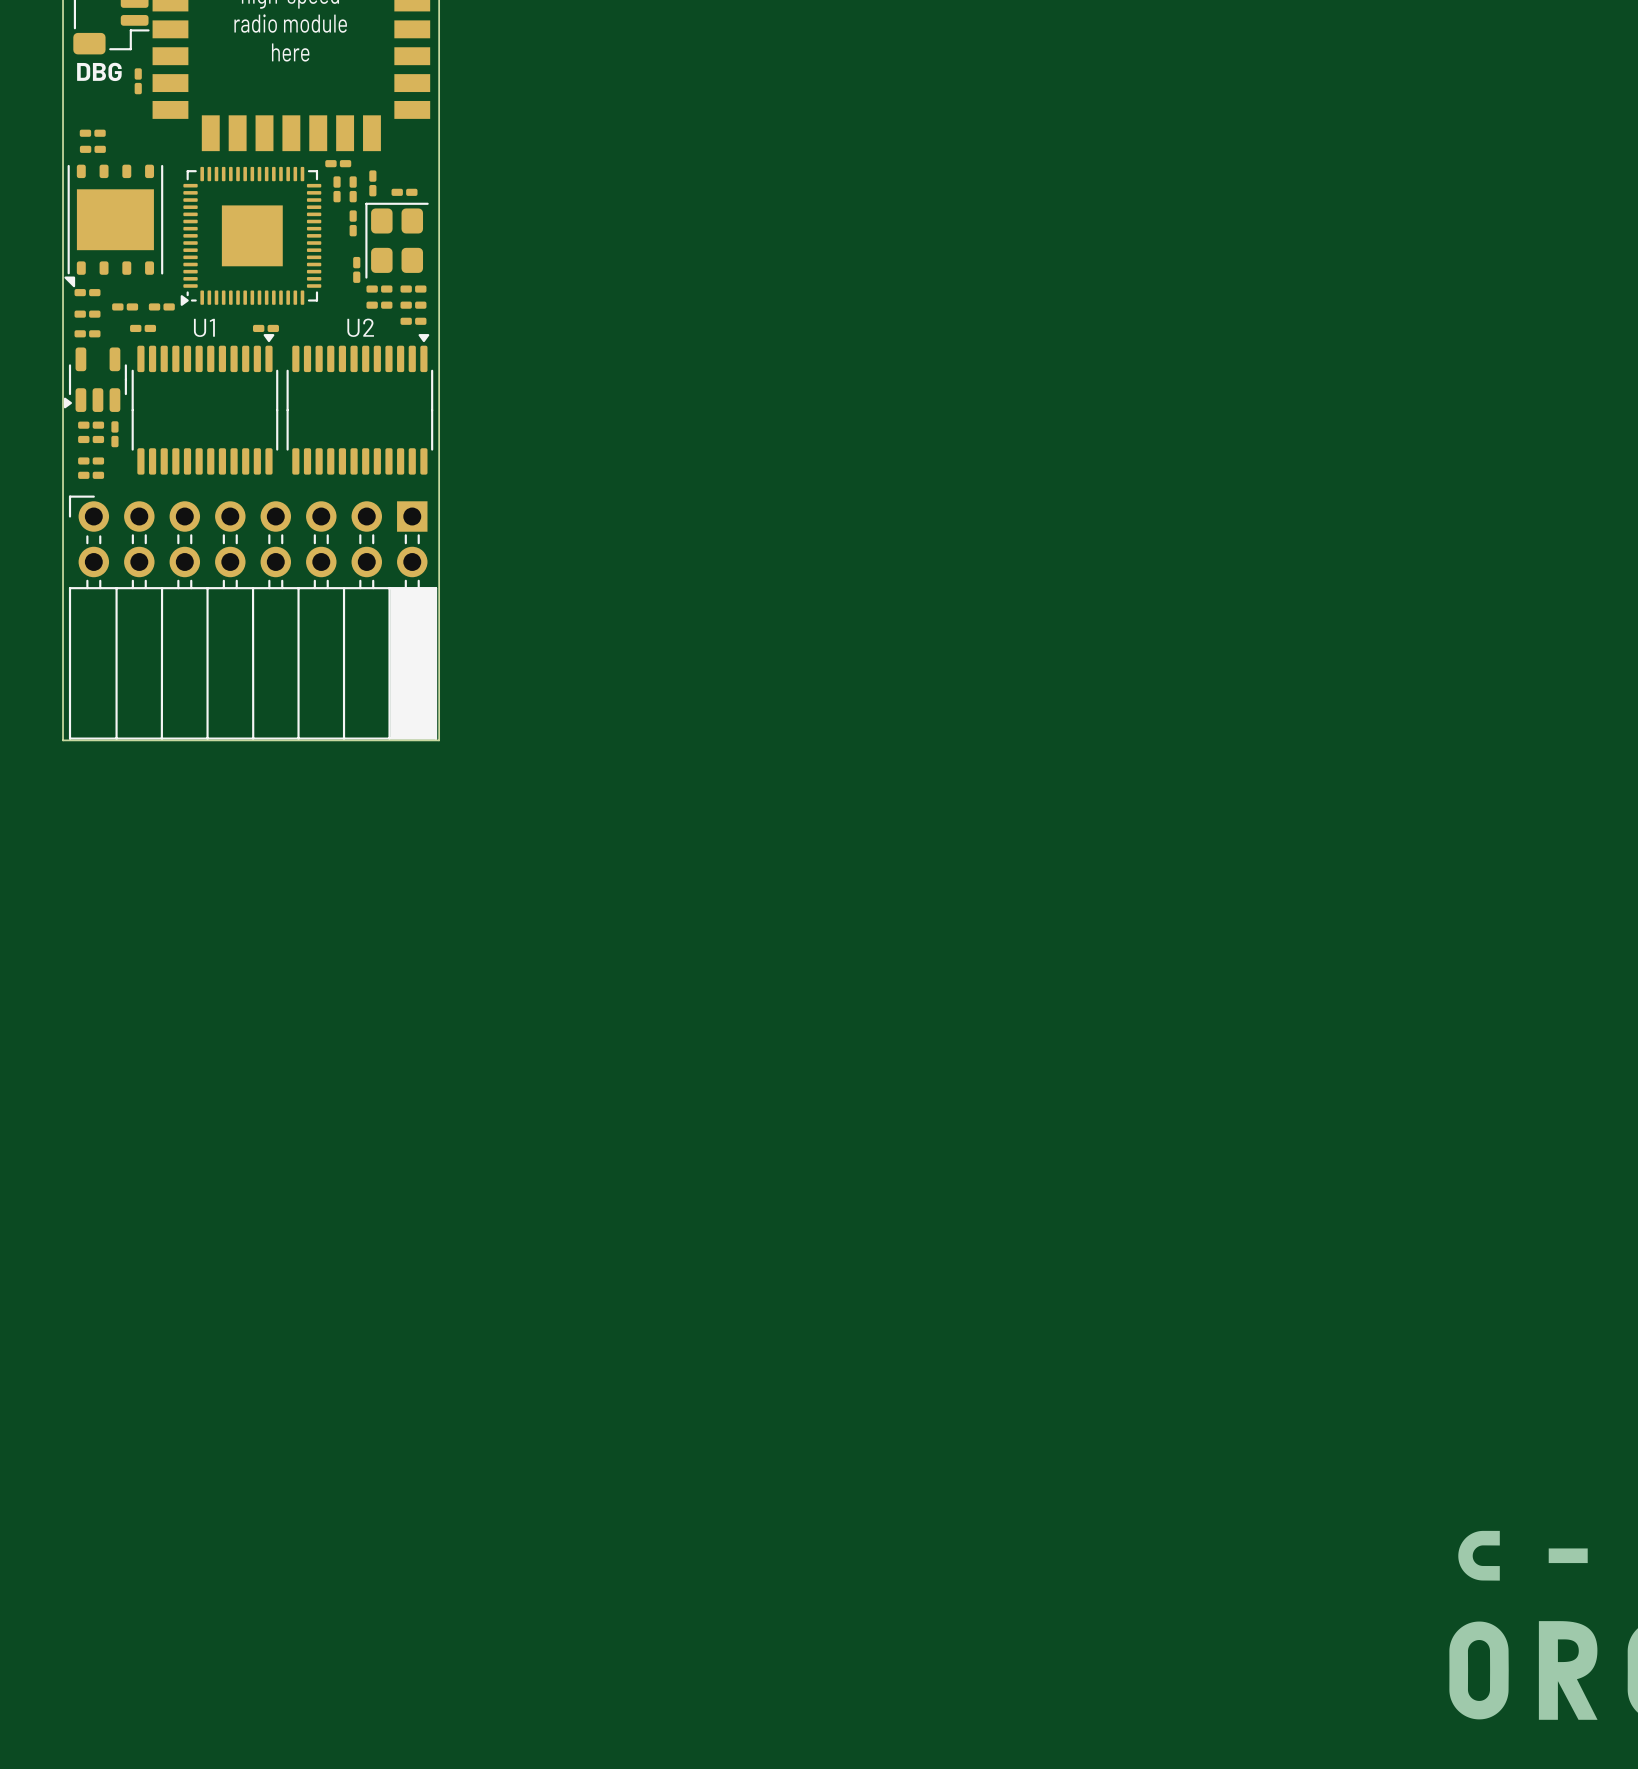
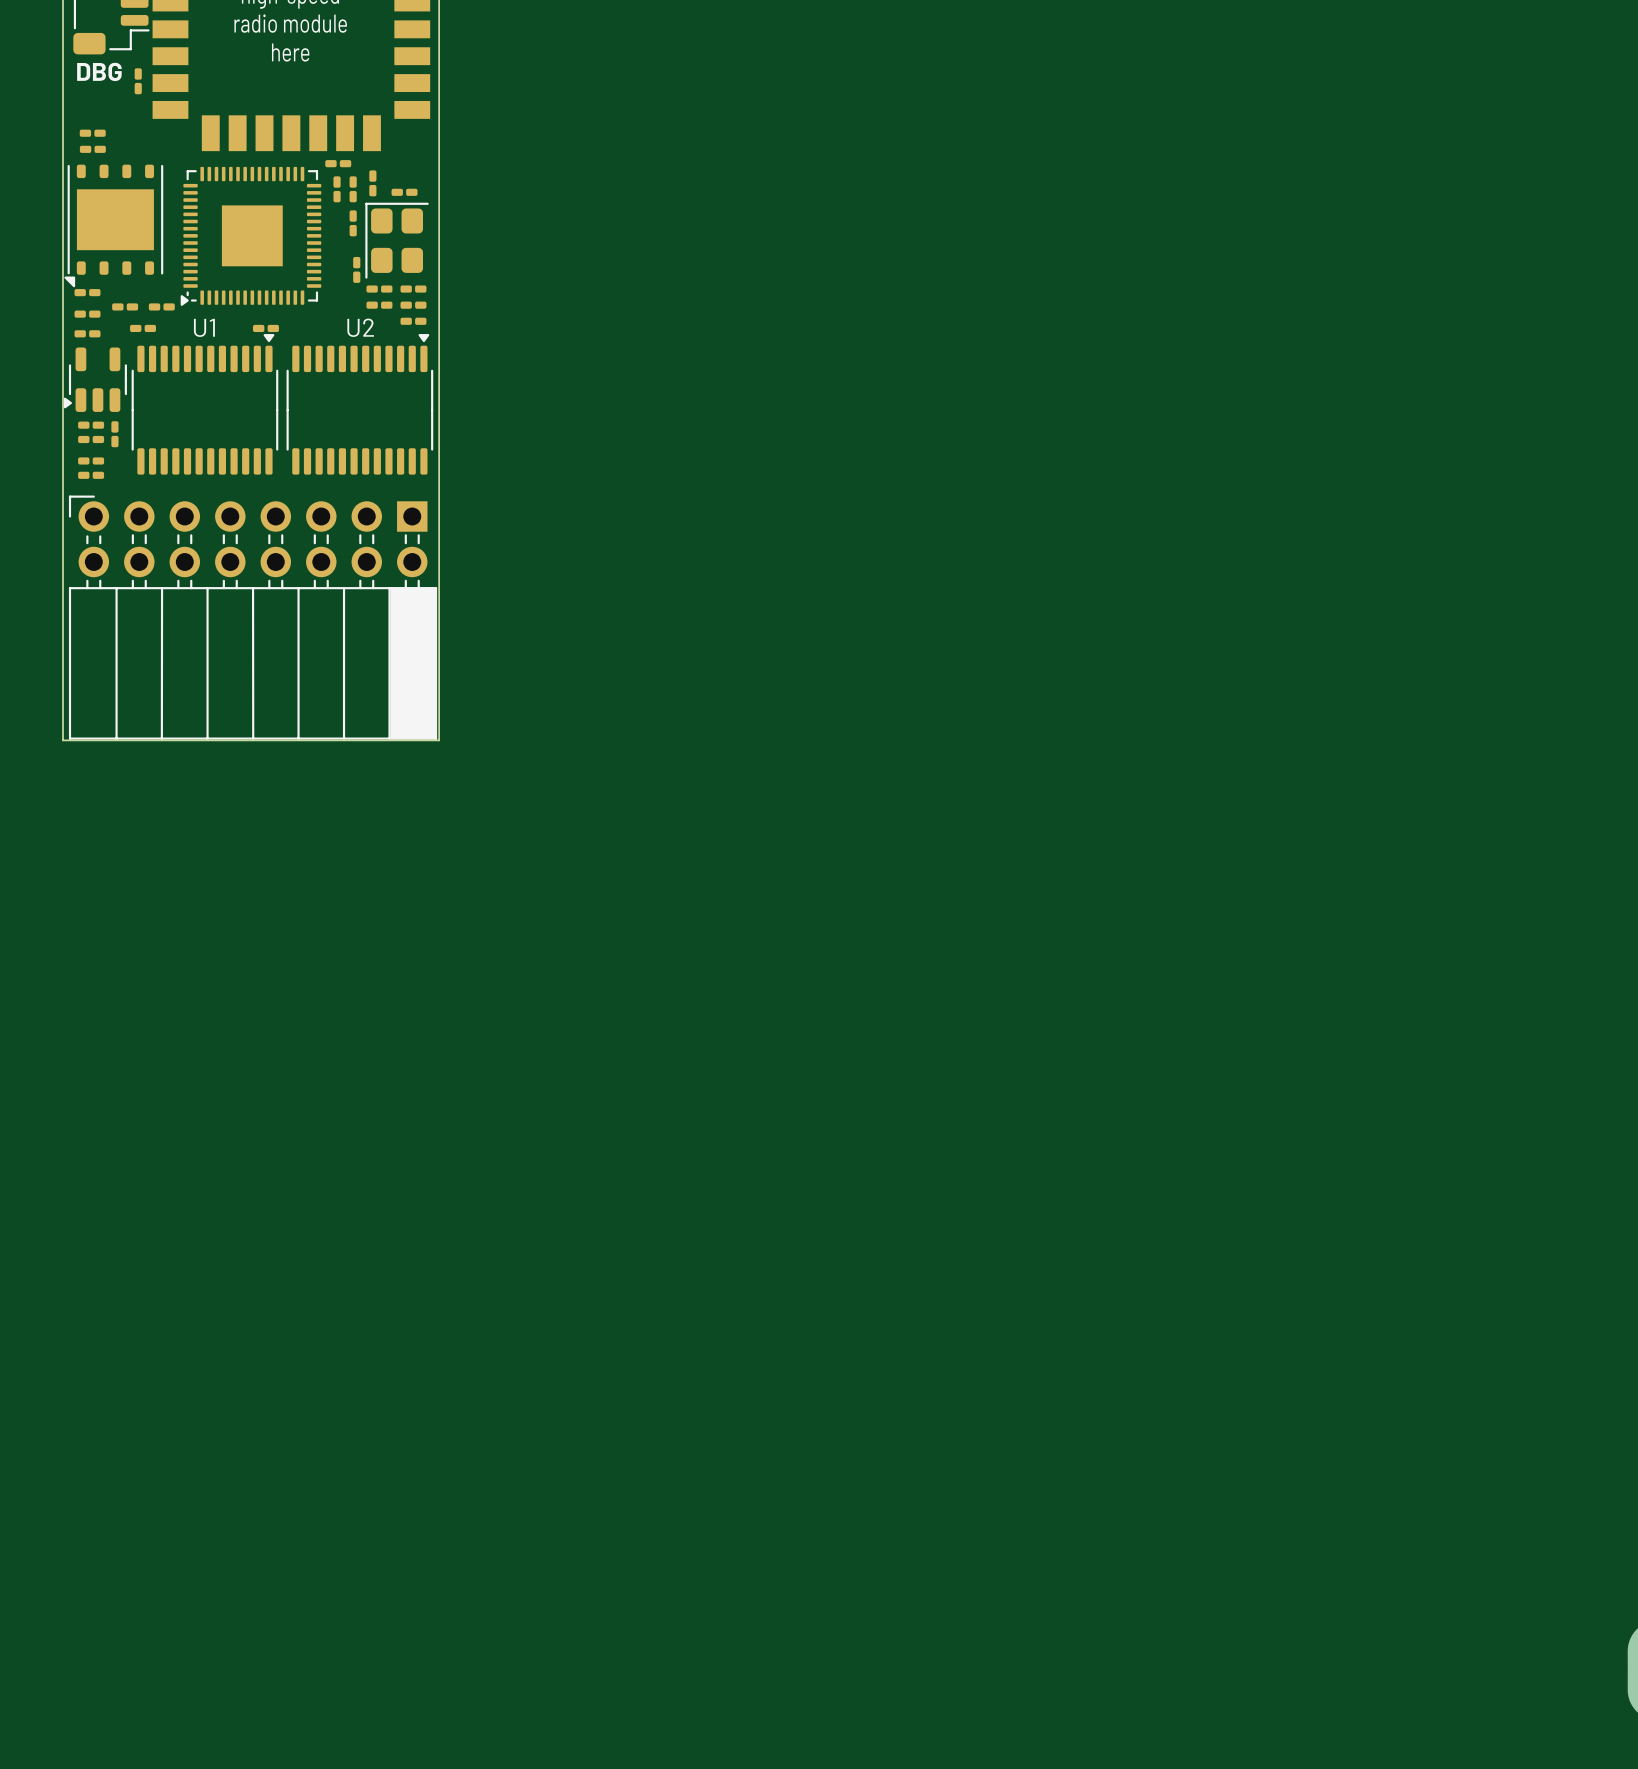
drawing: [1458, 1530, 1500, 1581] -> none
drawing: [1548, 1548, 1588, 1564] -> none
drawing: [1449, 1621, 1509, 1720] -> none
drawing: [1538, 1621, 1598, 1720] -> none

